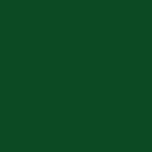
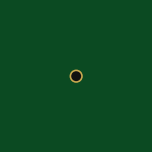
via: none -> (76, 76)

